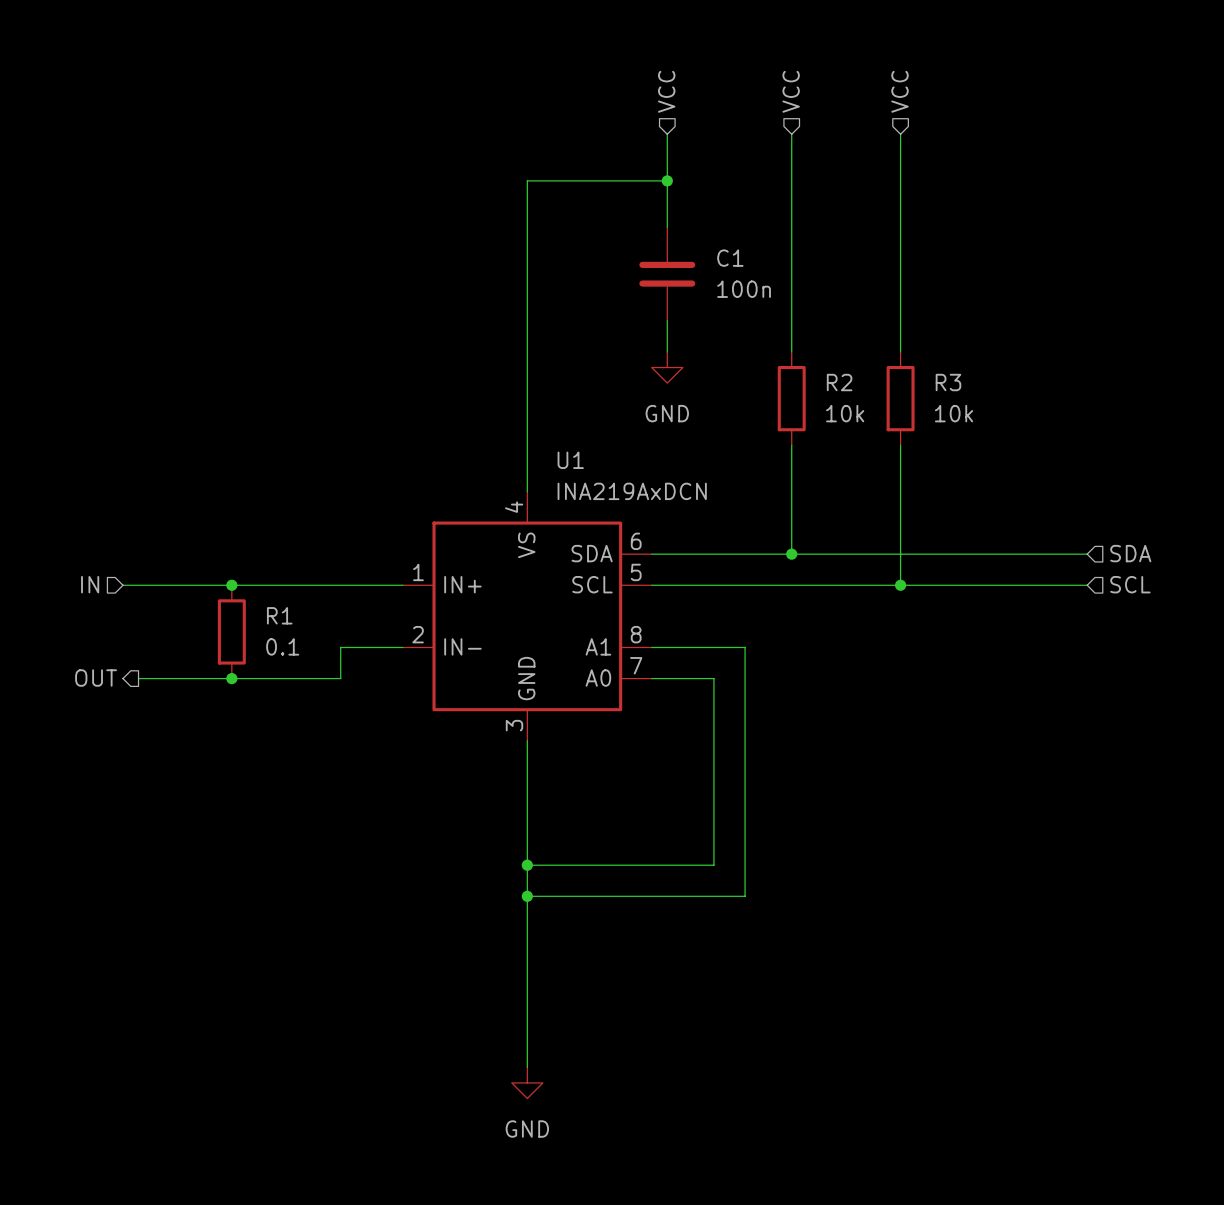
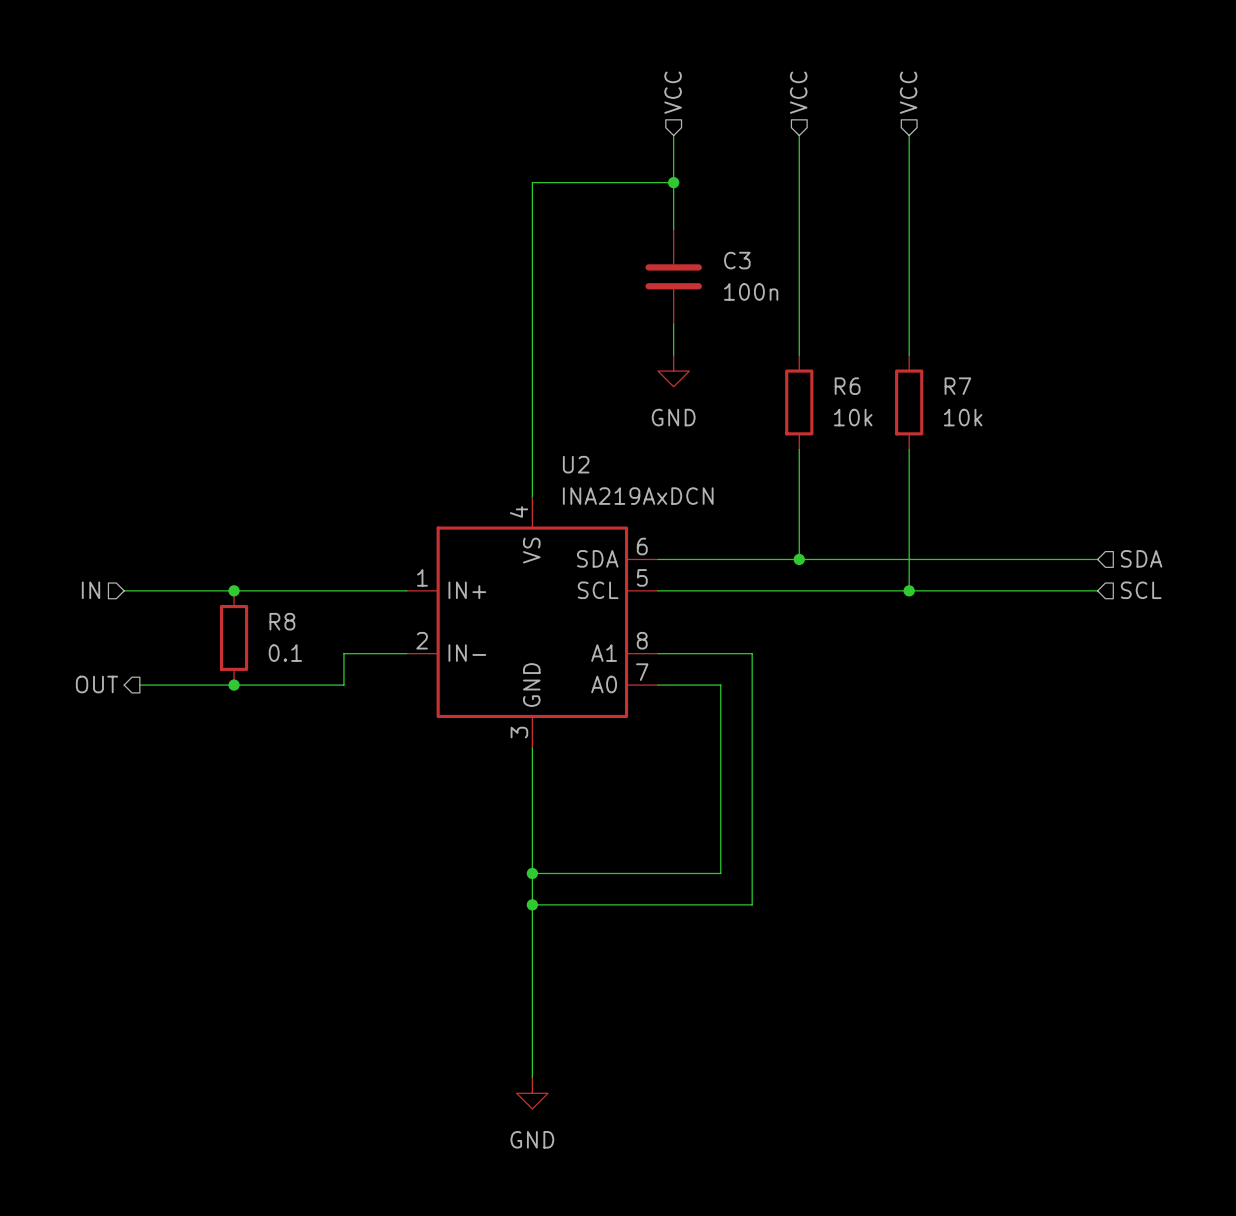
C1 name: C1 (730, 258) -> C3 (737, 260)
R2 name: R2 (839, 382) -> R6 (847, 386)
R3 name: R3 (948, 382) -> R7 (957, 386)
U1 name: U1 (570, 460) -> U2 (576, 464)
R1 name: R1 (279, 615) -> R8 (282, 621)

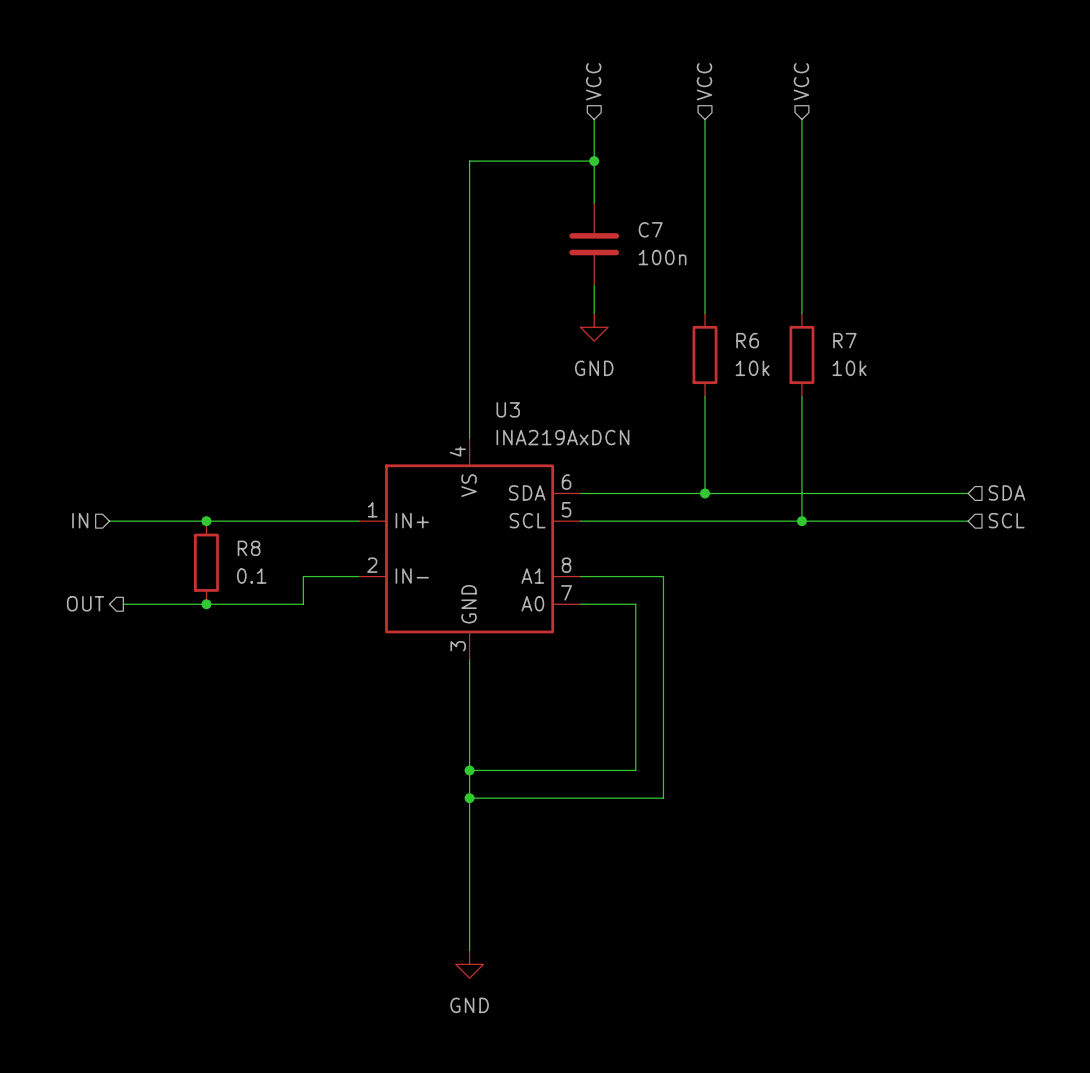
C3 name: C3 (737, 260) -> C7 (650, 229)
U2 name: U2 (576, 464) -> U3 (508, 409)

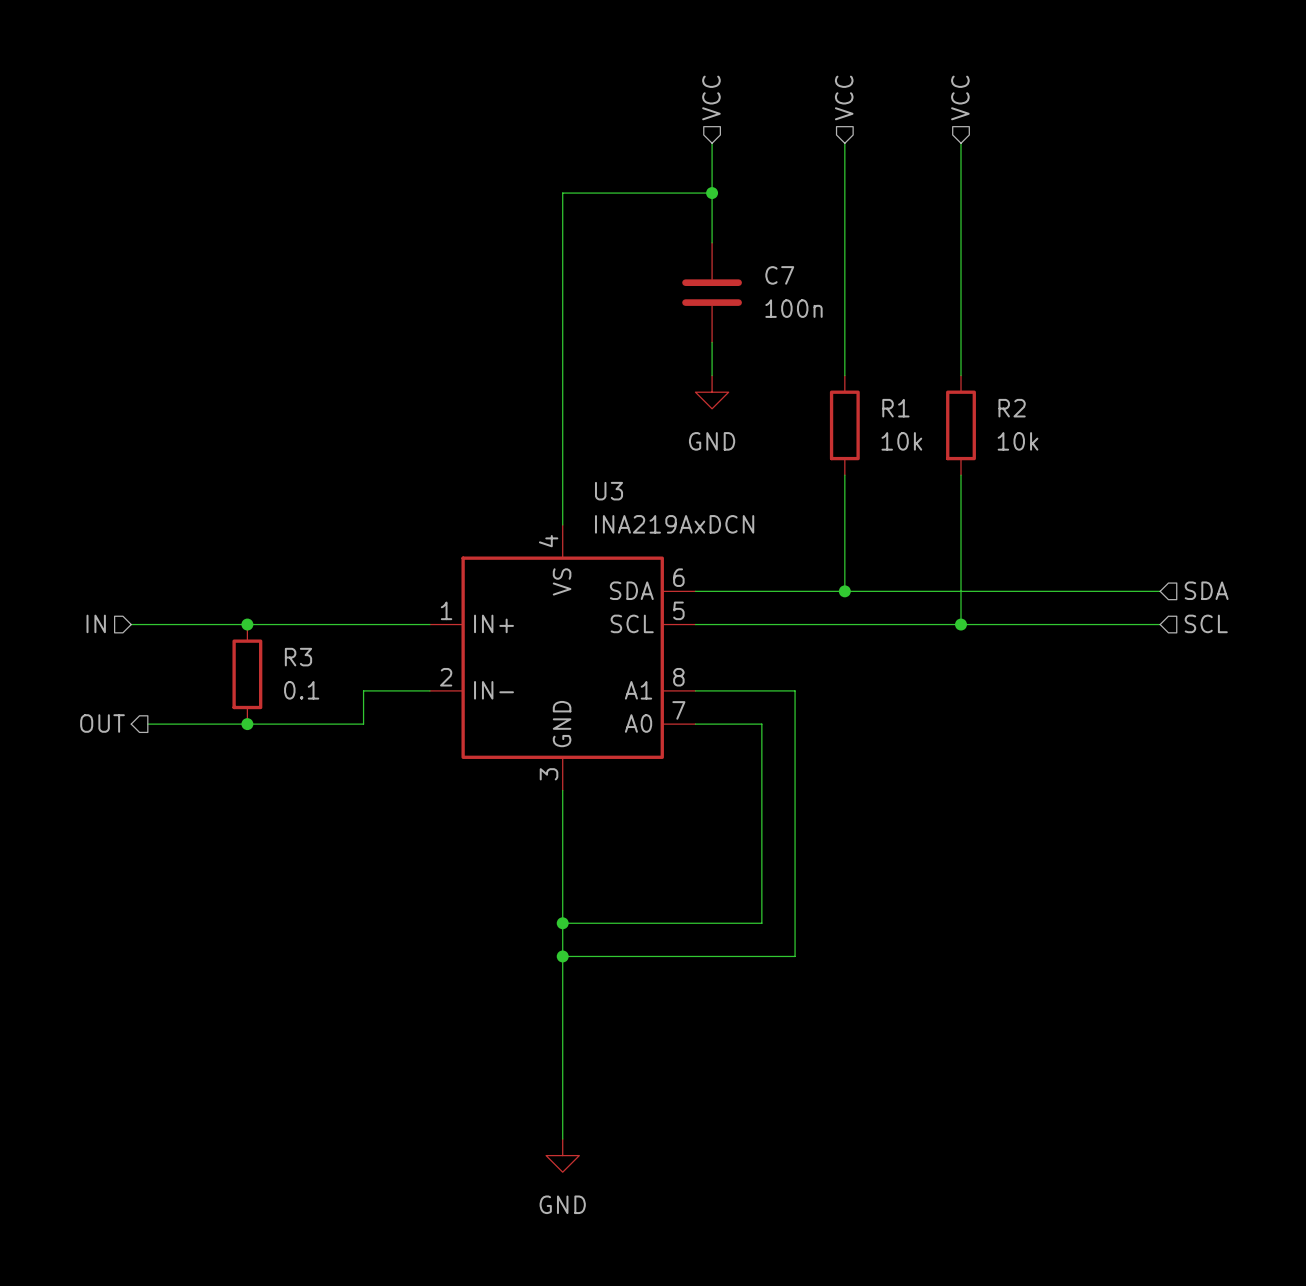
R6 name: R6 (747, 340) -> R1 (895, 408)
R7 name: R7 (844, 340) -> R2 (1012, 408)
R8 name: R8 (249, 548) -> R3 (298, 657)

